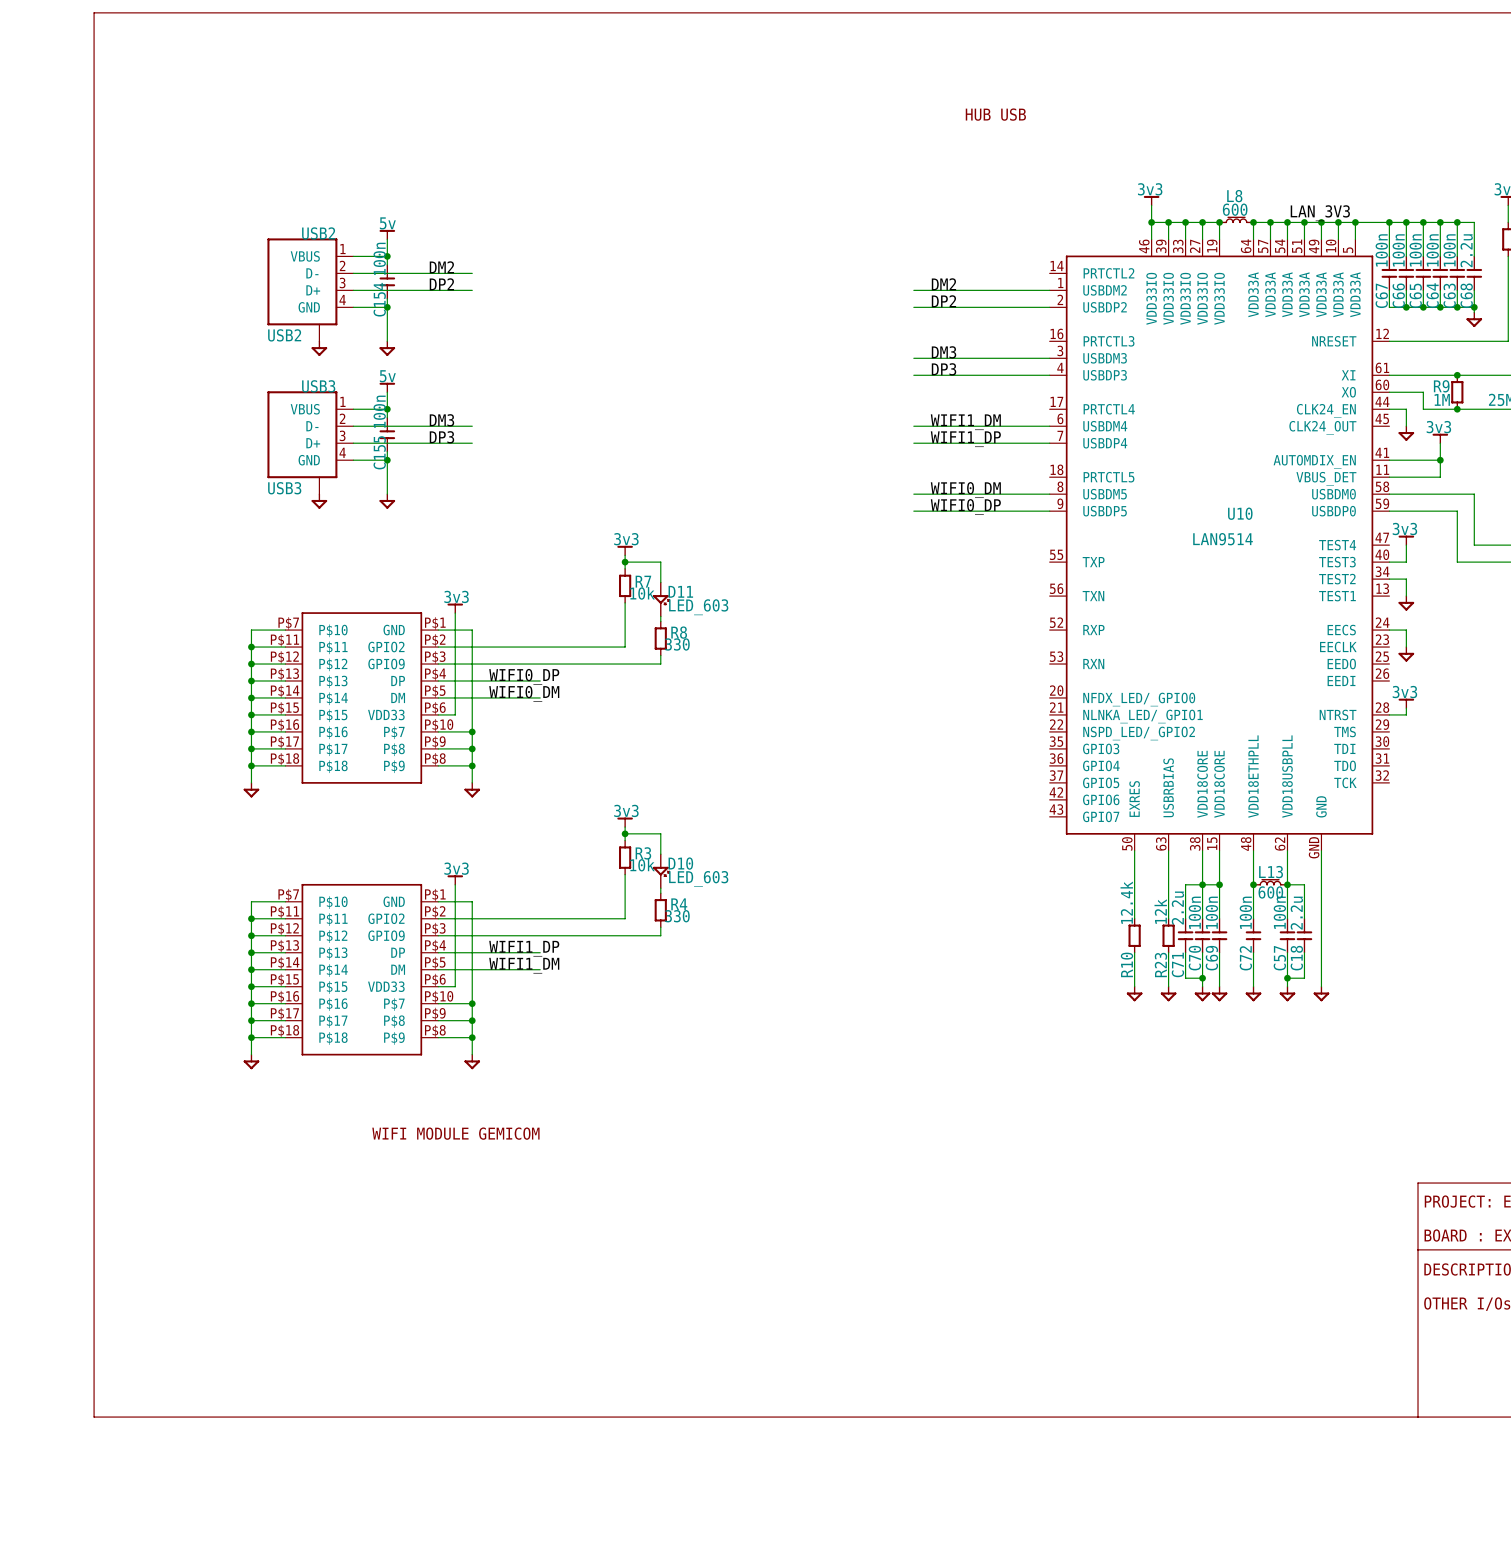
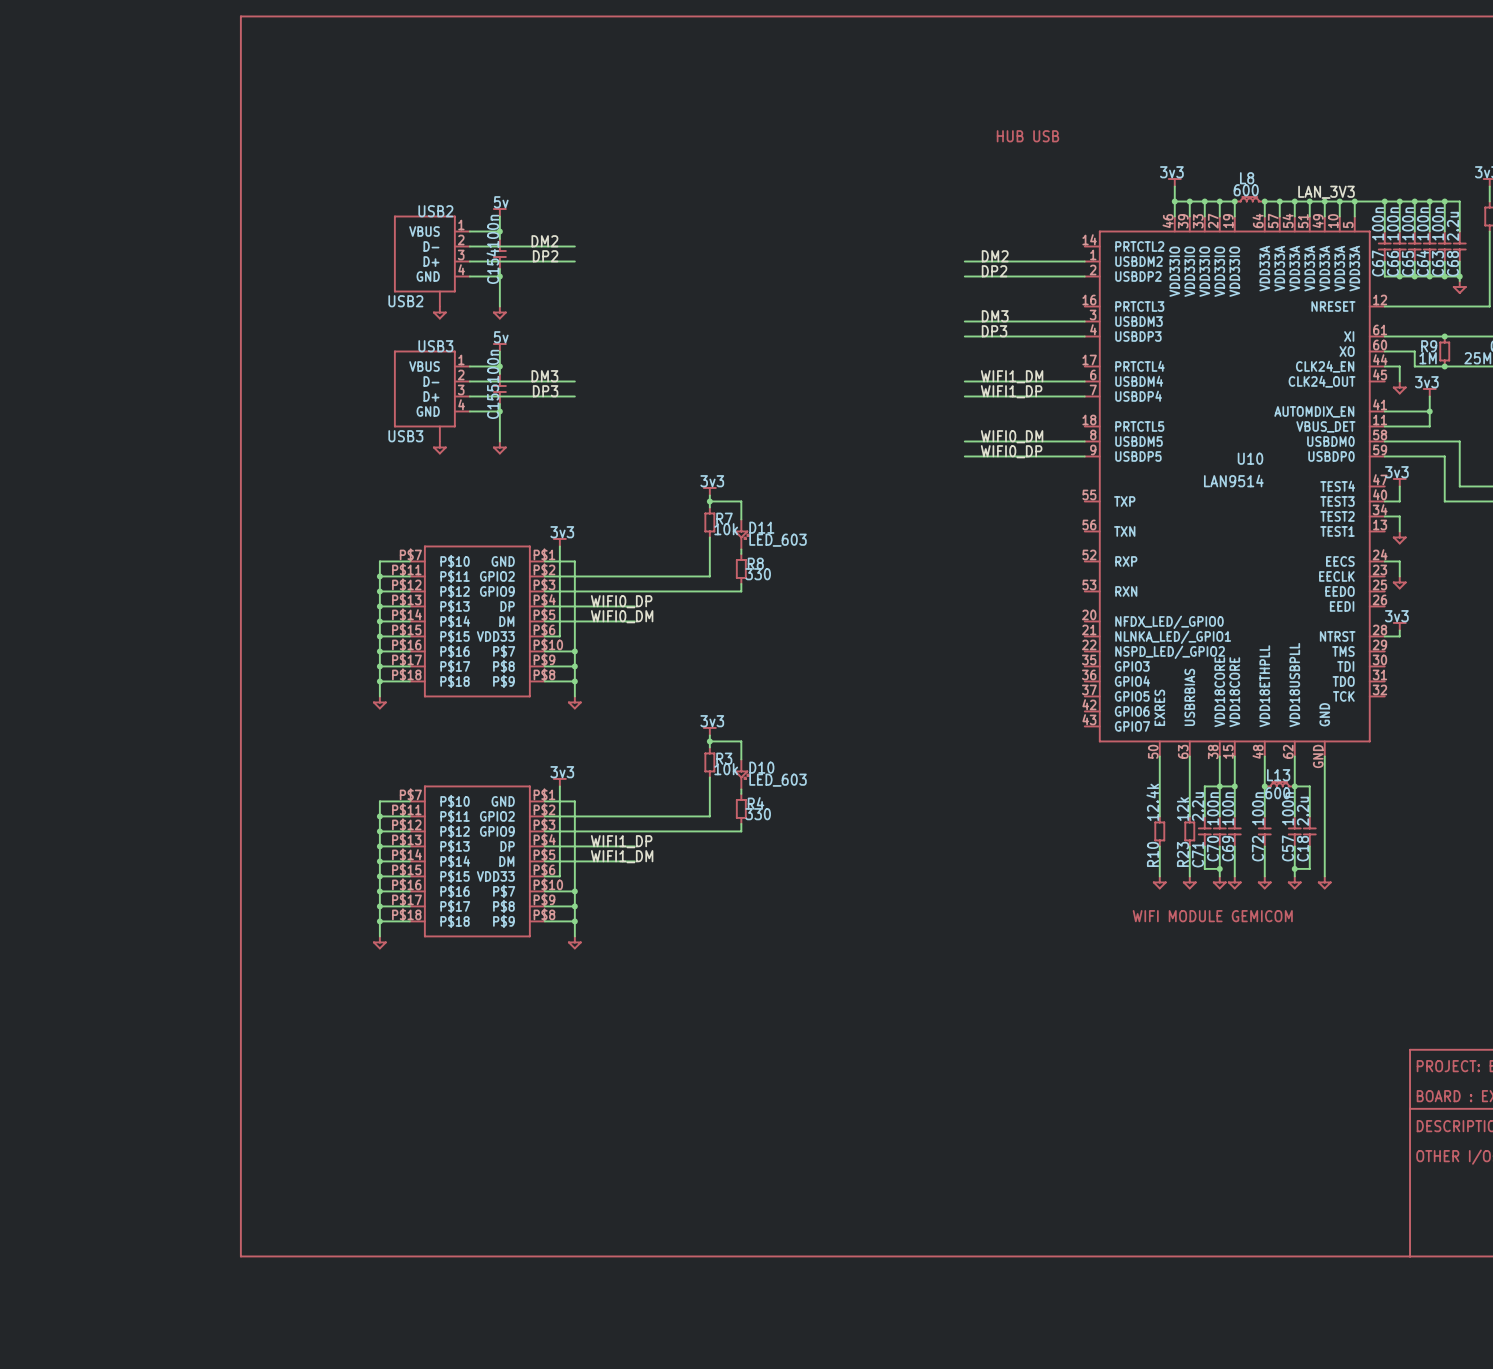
text position: HUB USB (995, 114) -> HUB USB (1027, 136)
text: none -> WIFI MODULE GEMICOM (1212, 916)
text: WIFI MODULE GEMICOM (455, 1133) -> none

